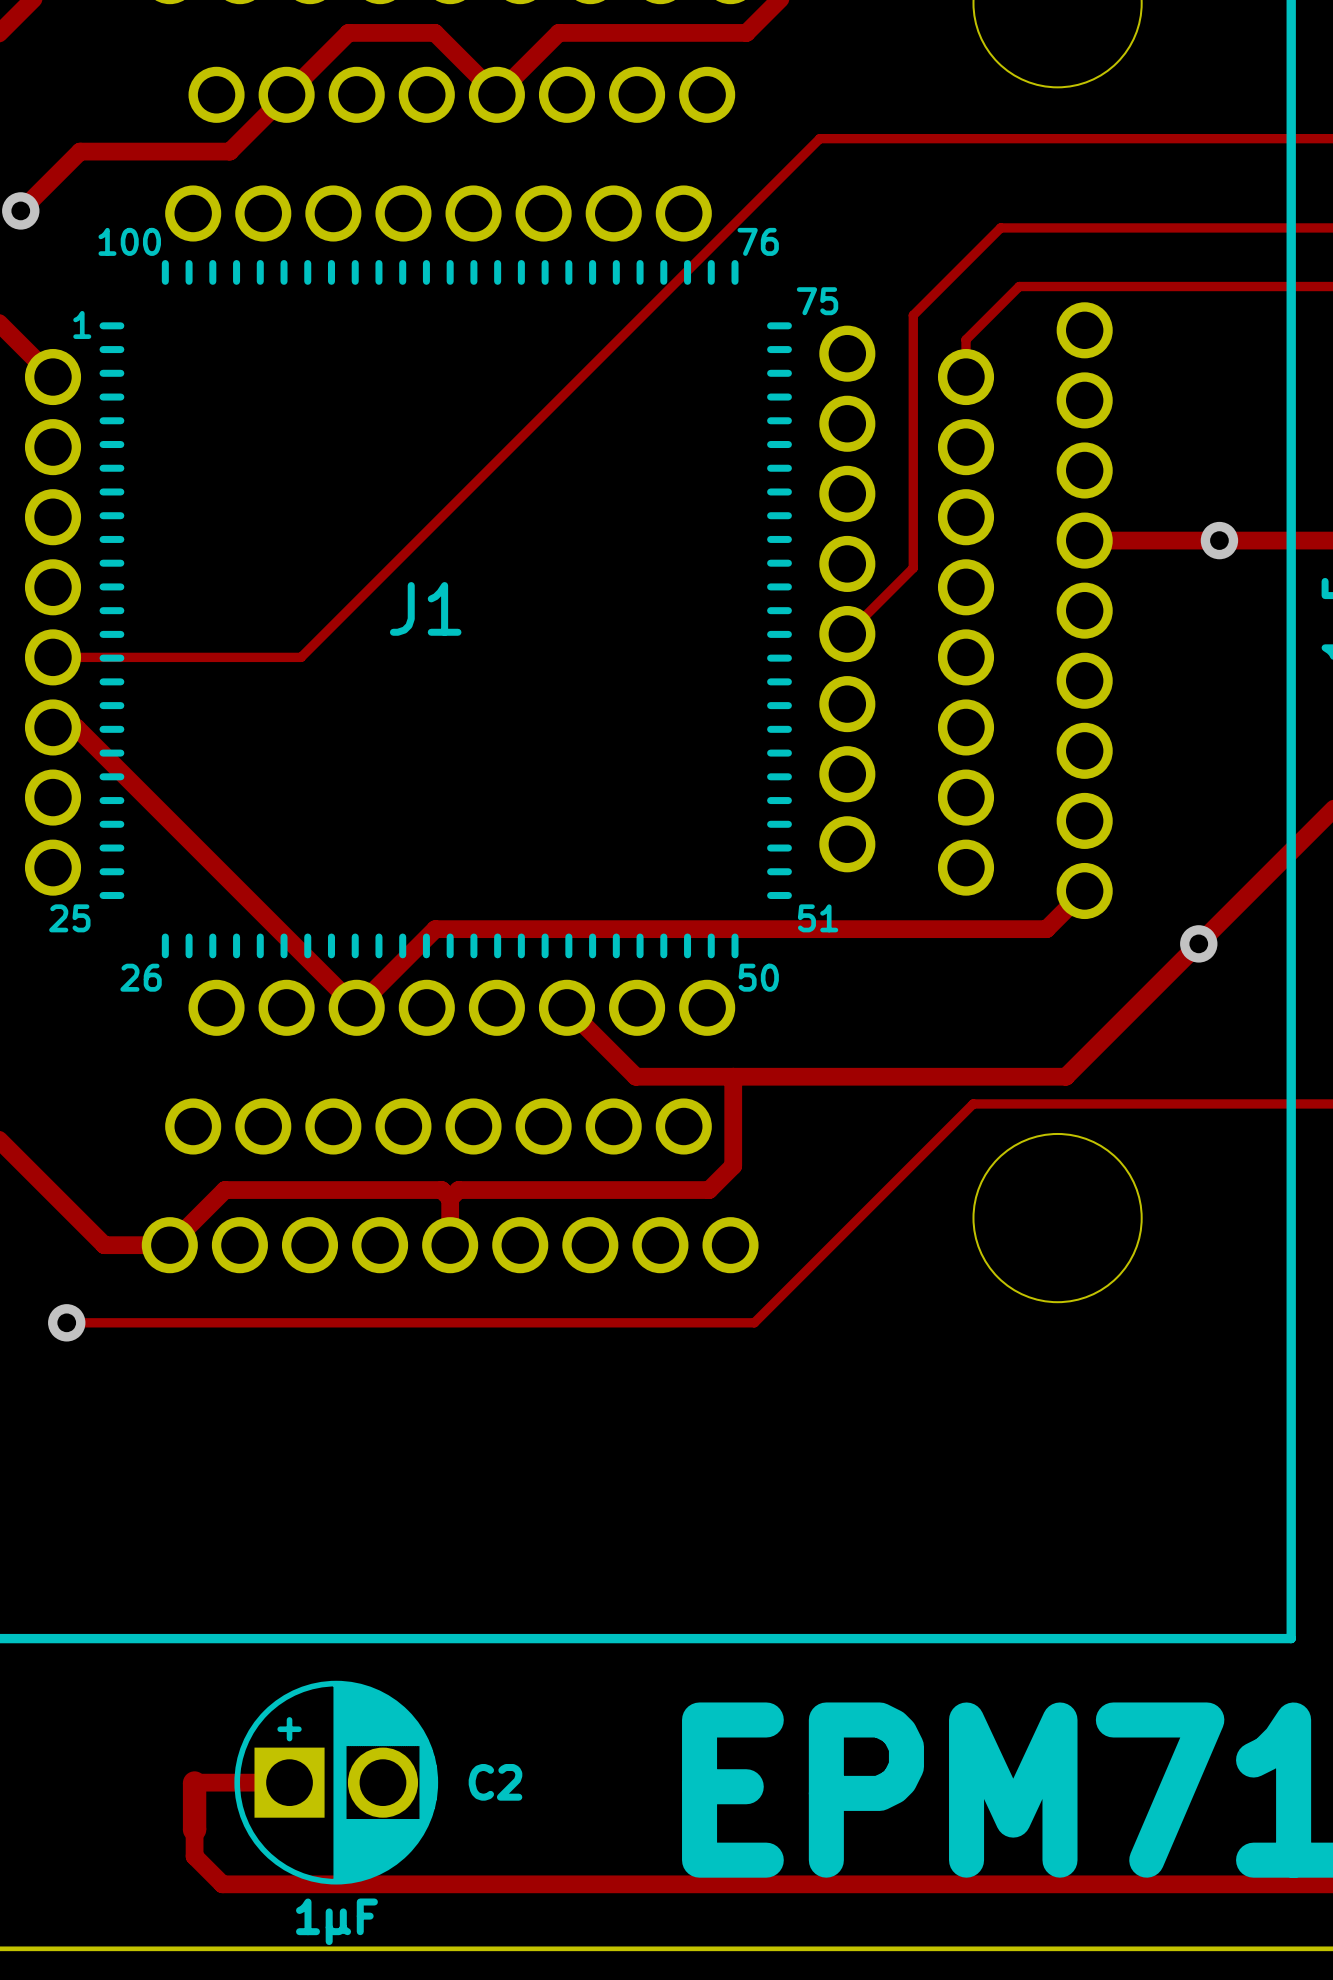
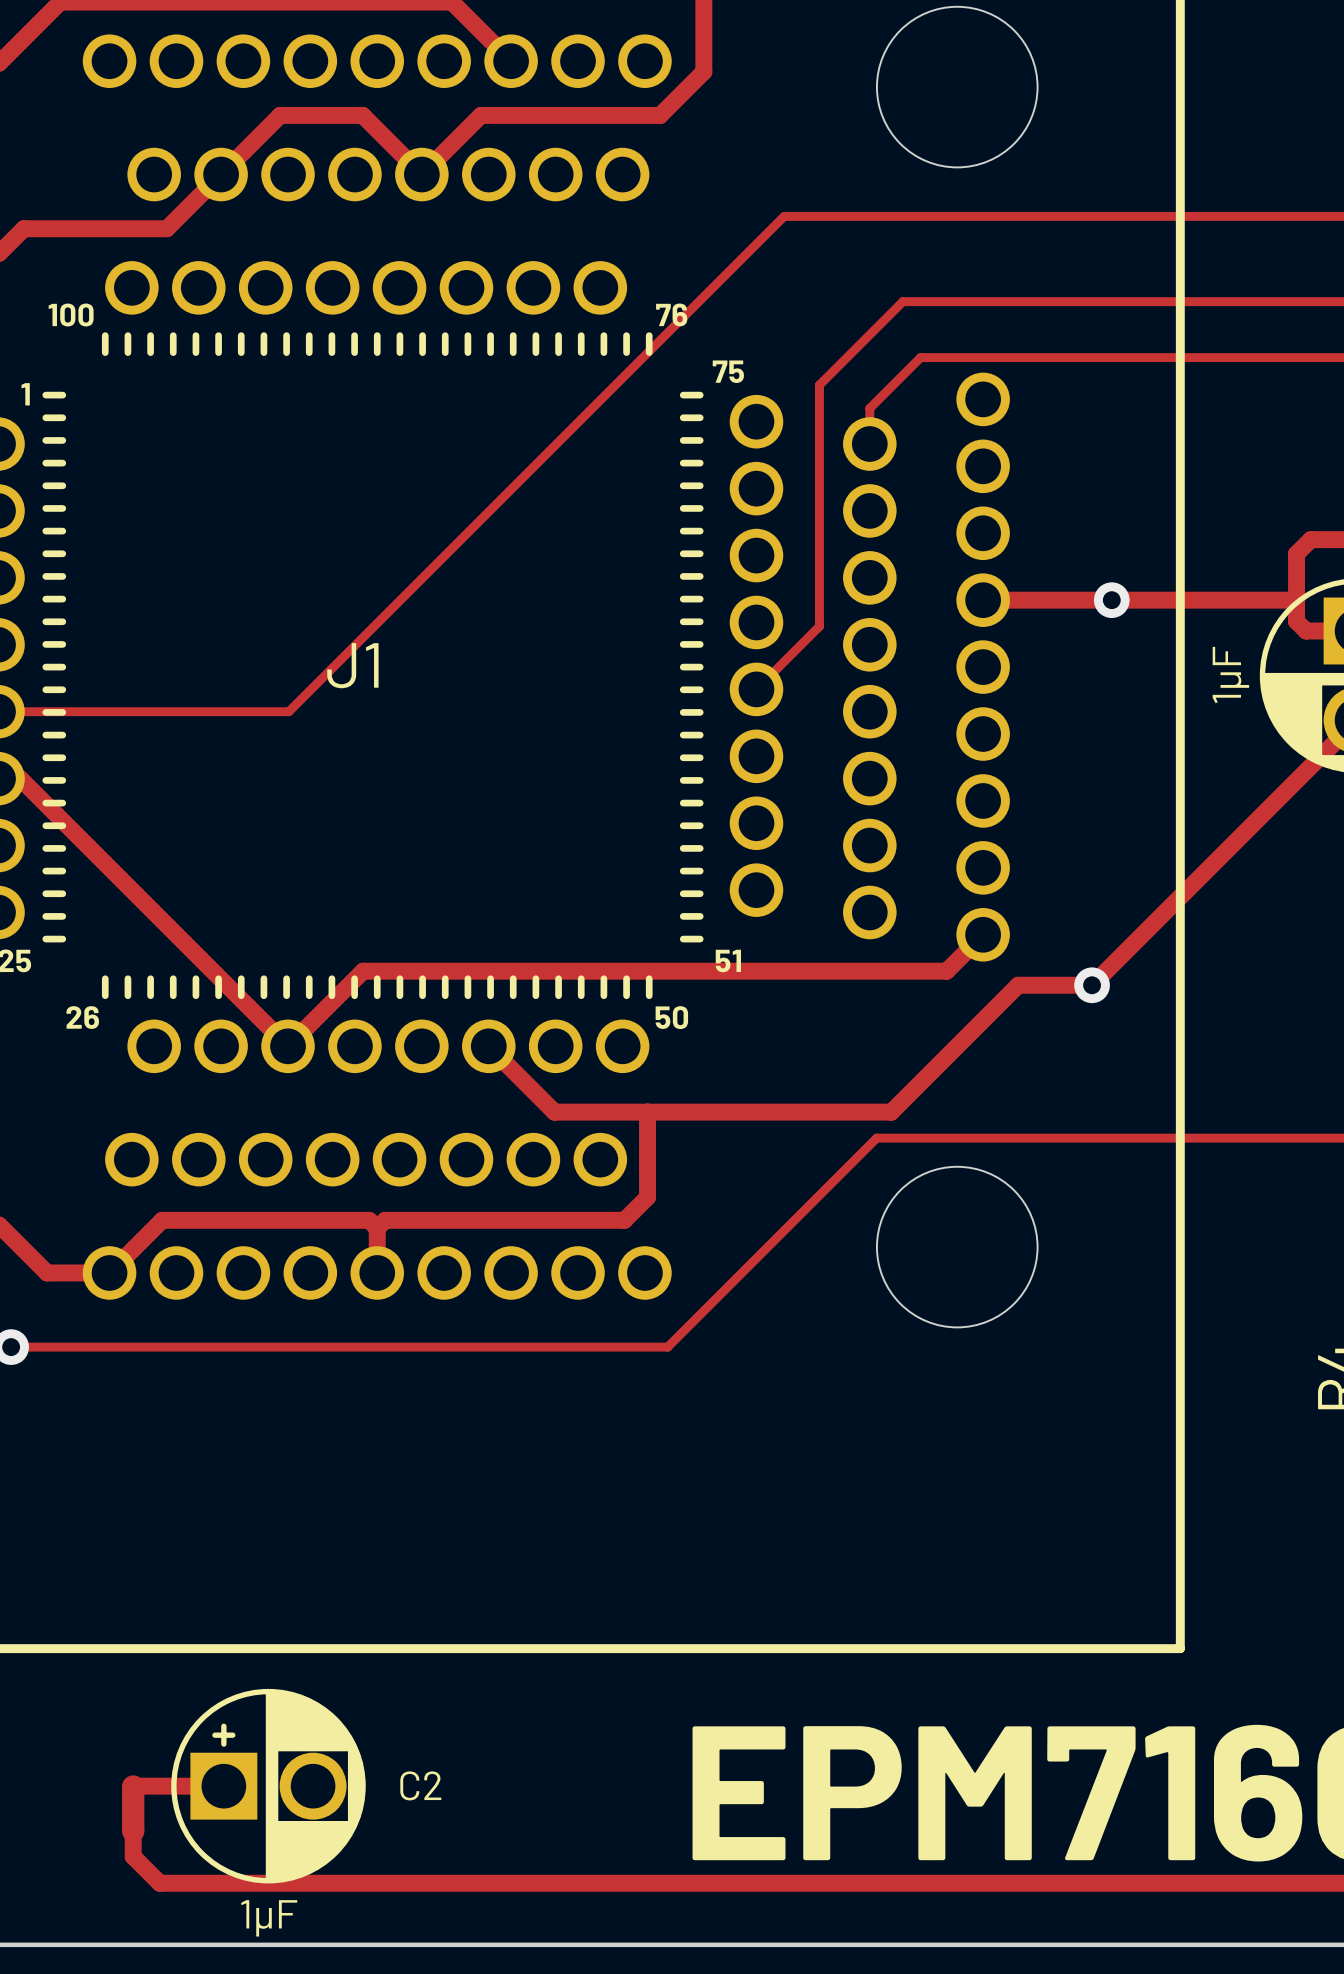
track: (876, 138) (819, 138) (301, 657) -> (784, 216) (288, 711) (234, 711)
track: (1198, 943) (1065, 1076) (988, 1076) -> (1092, 985) (1018, 985) (891, 1112)

